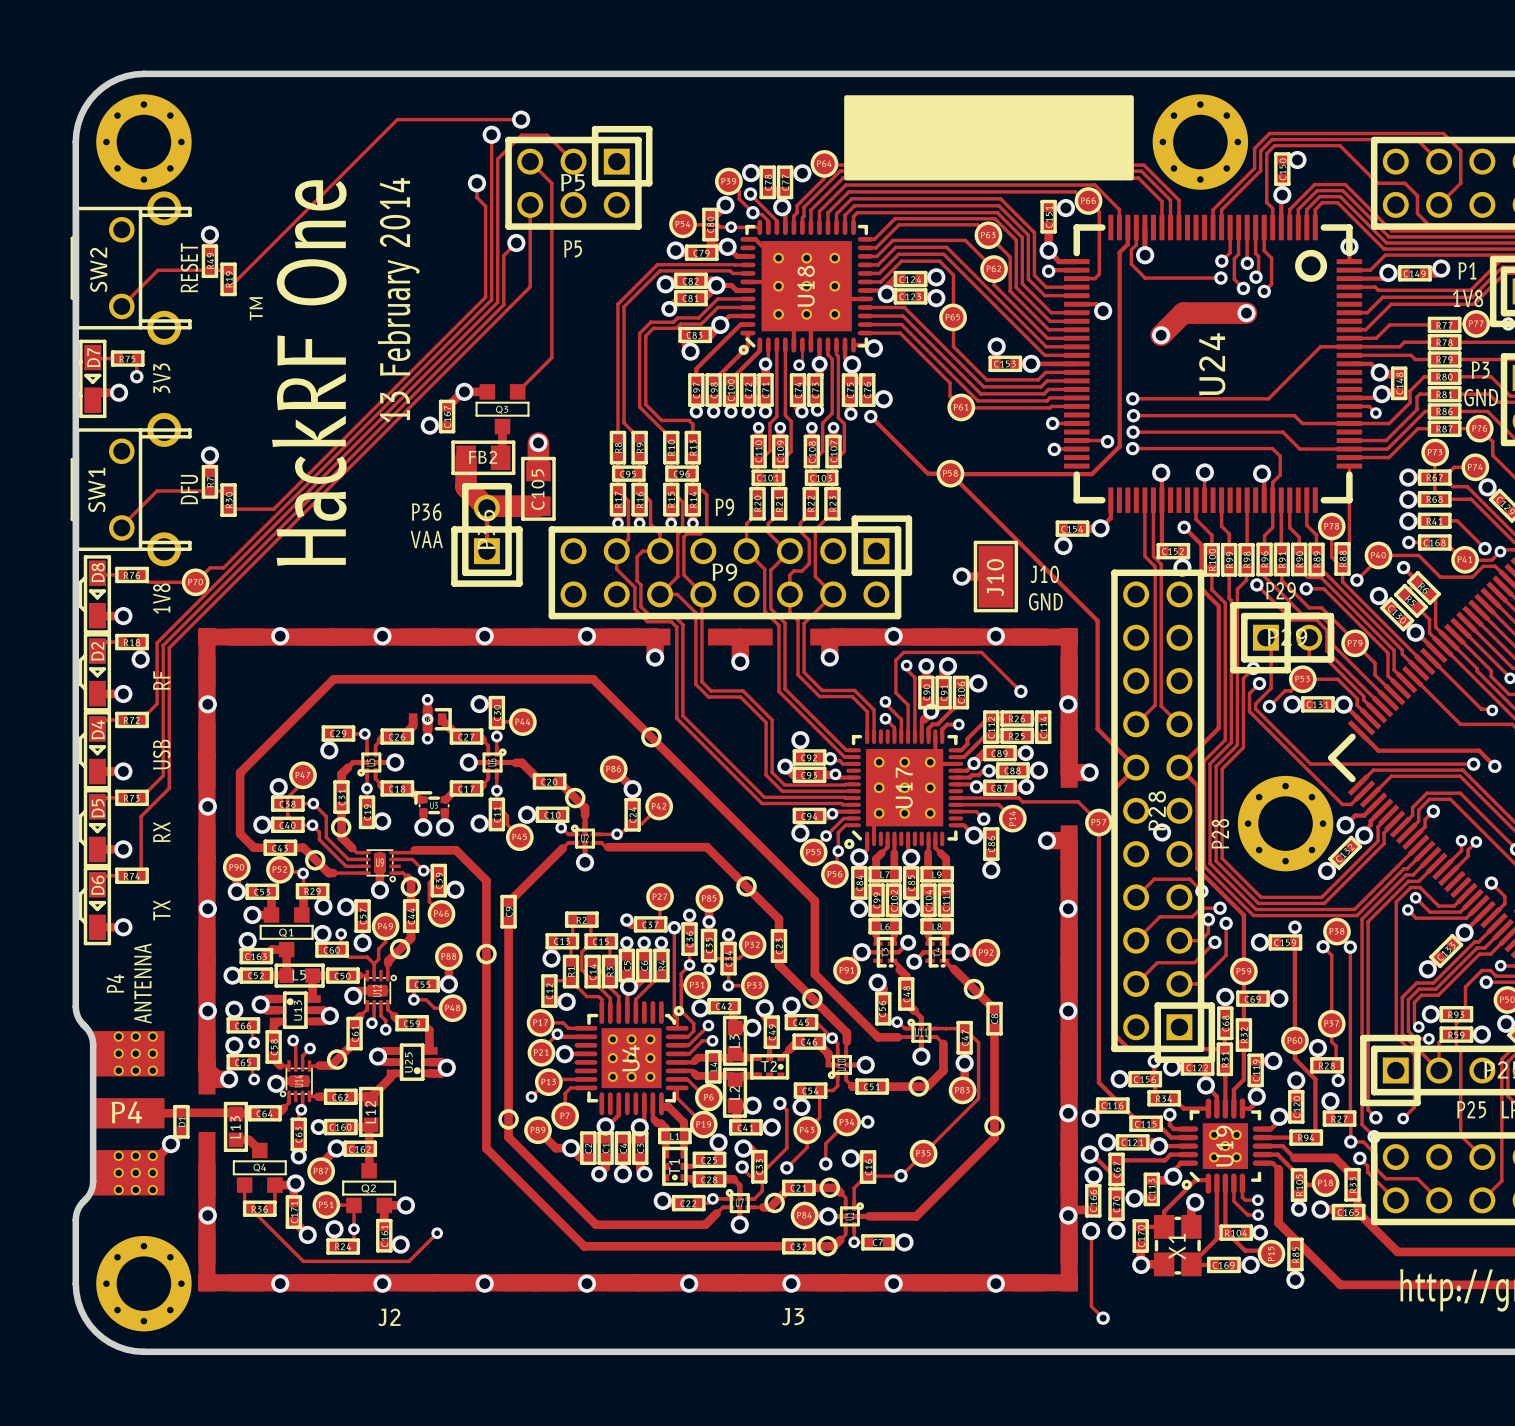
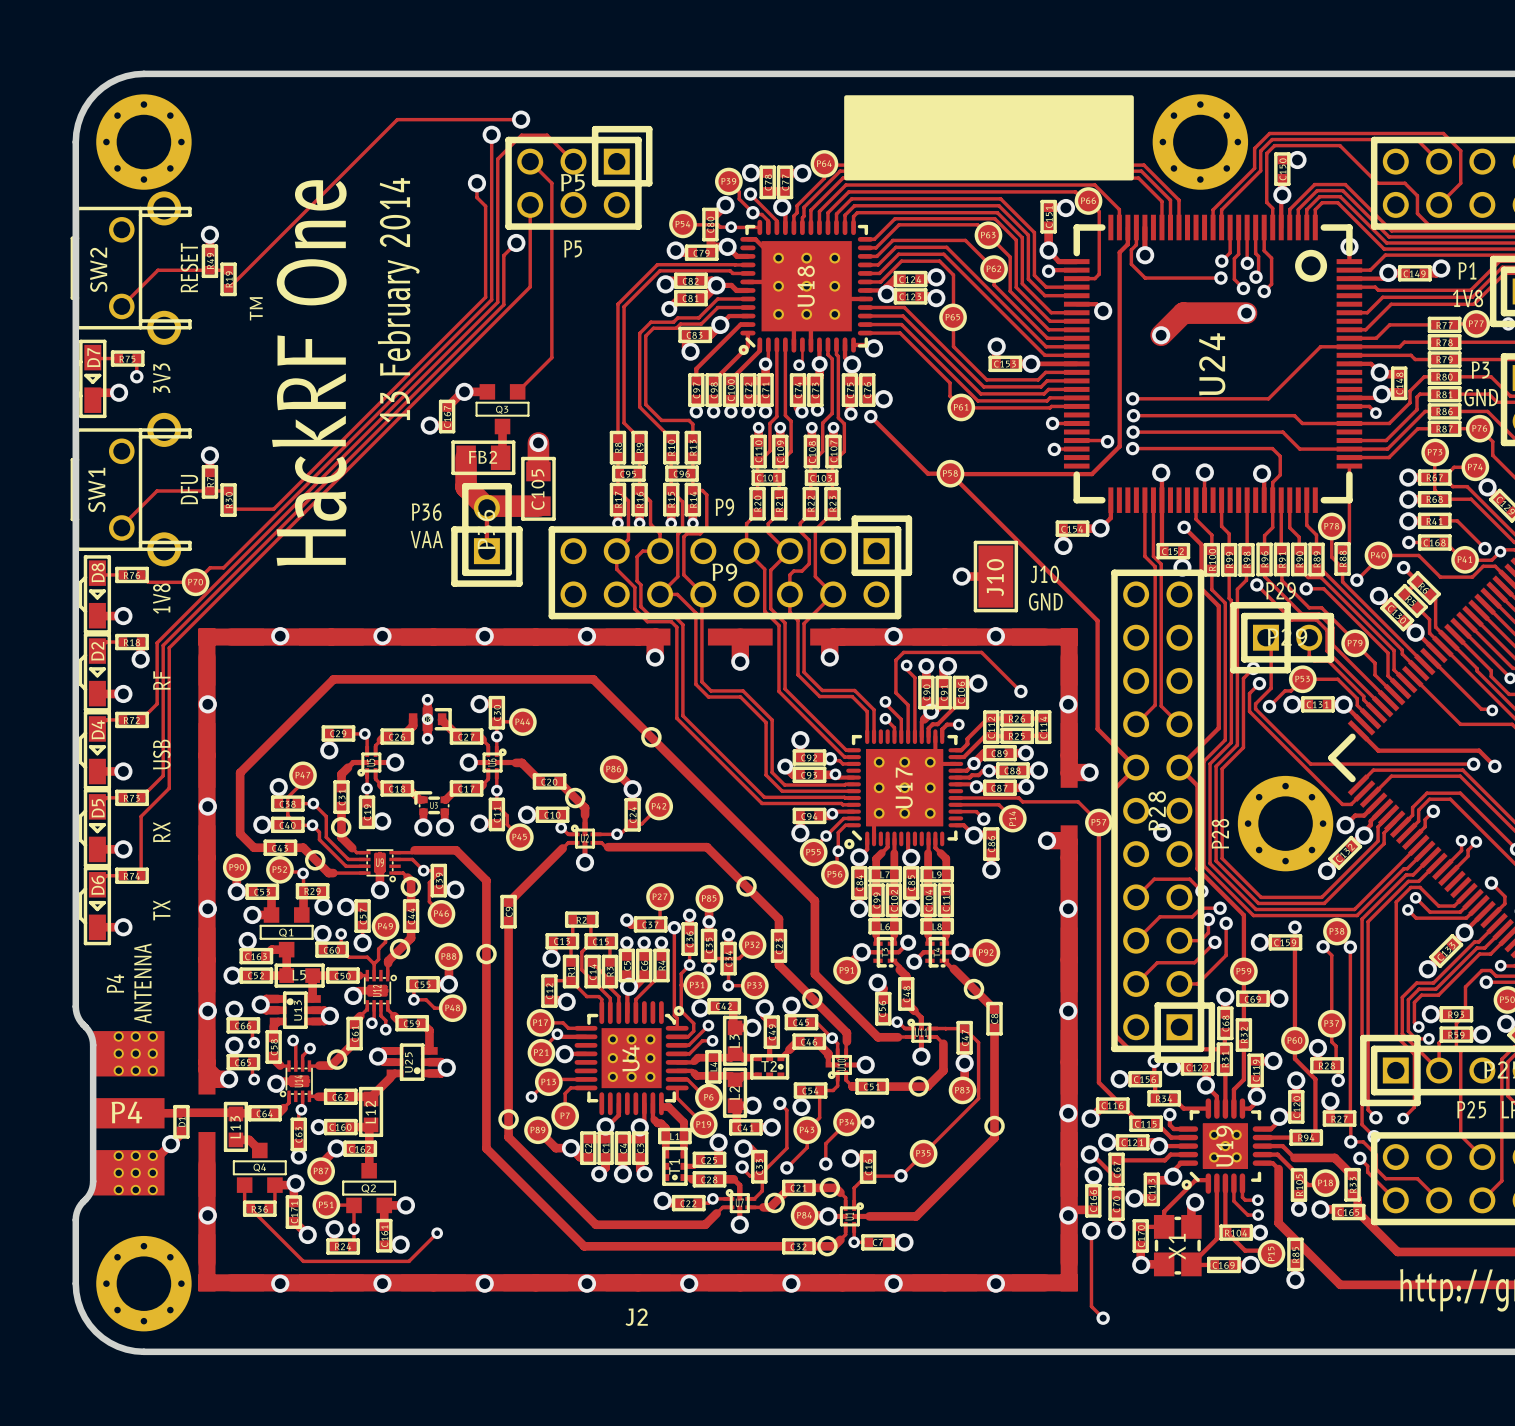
J3: (793, 1316) -> none
J2 name position: J2 (389, 1317) -> J2 (636, 1317)

